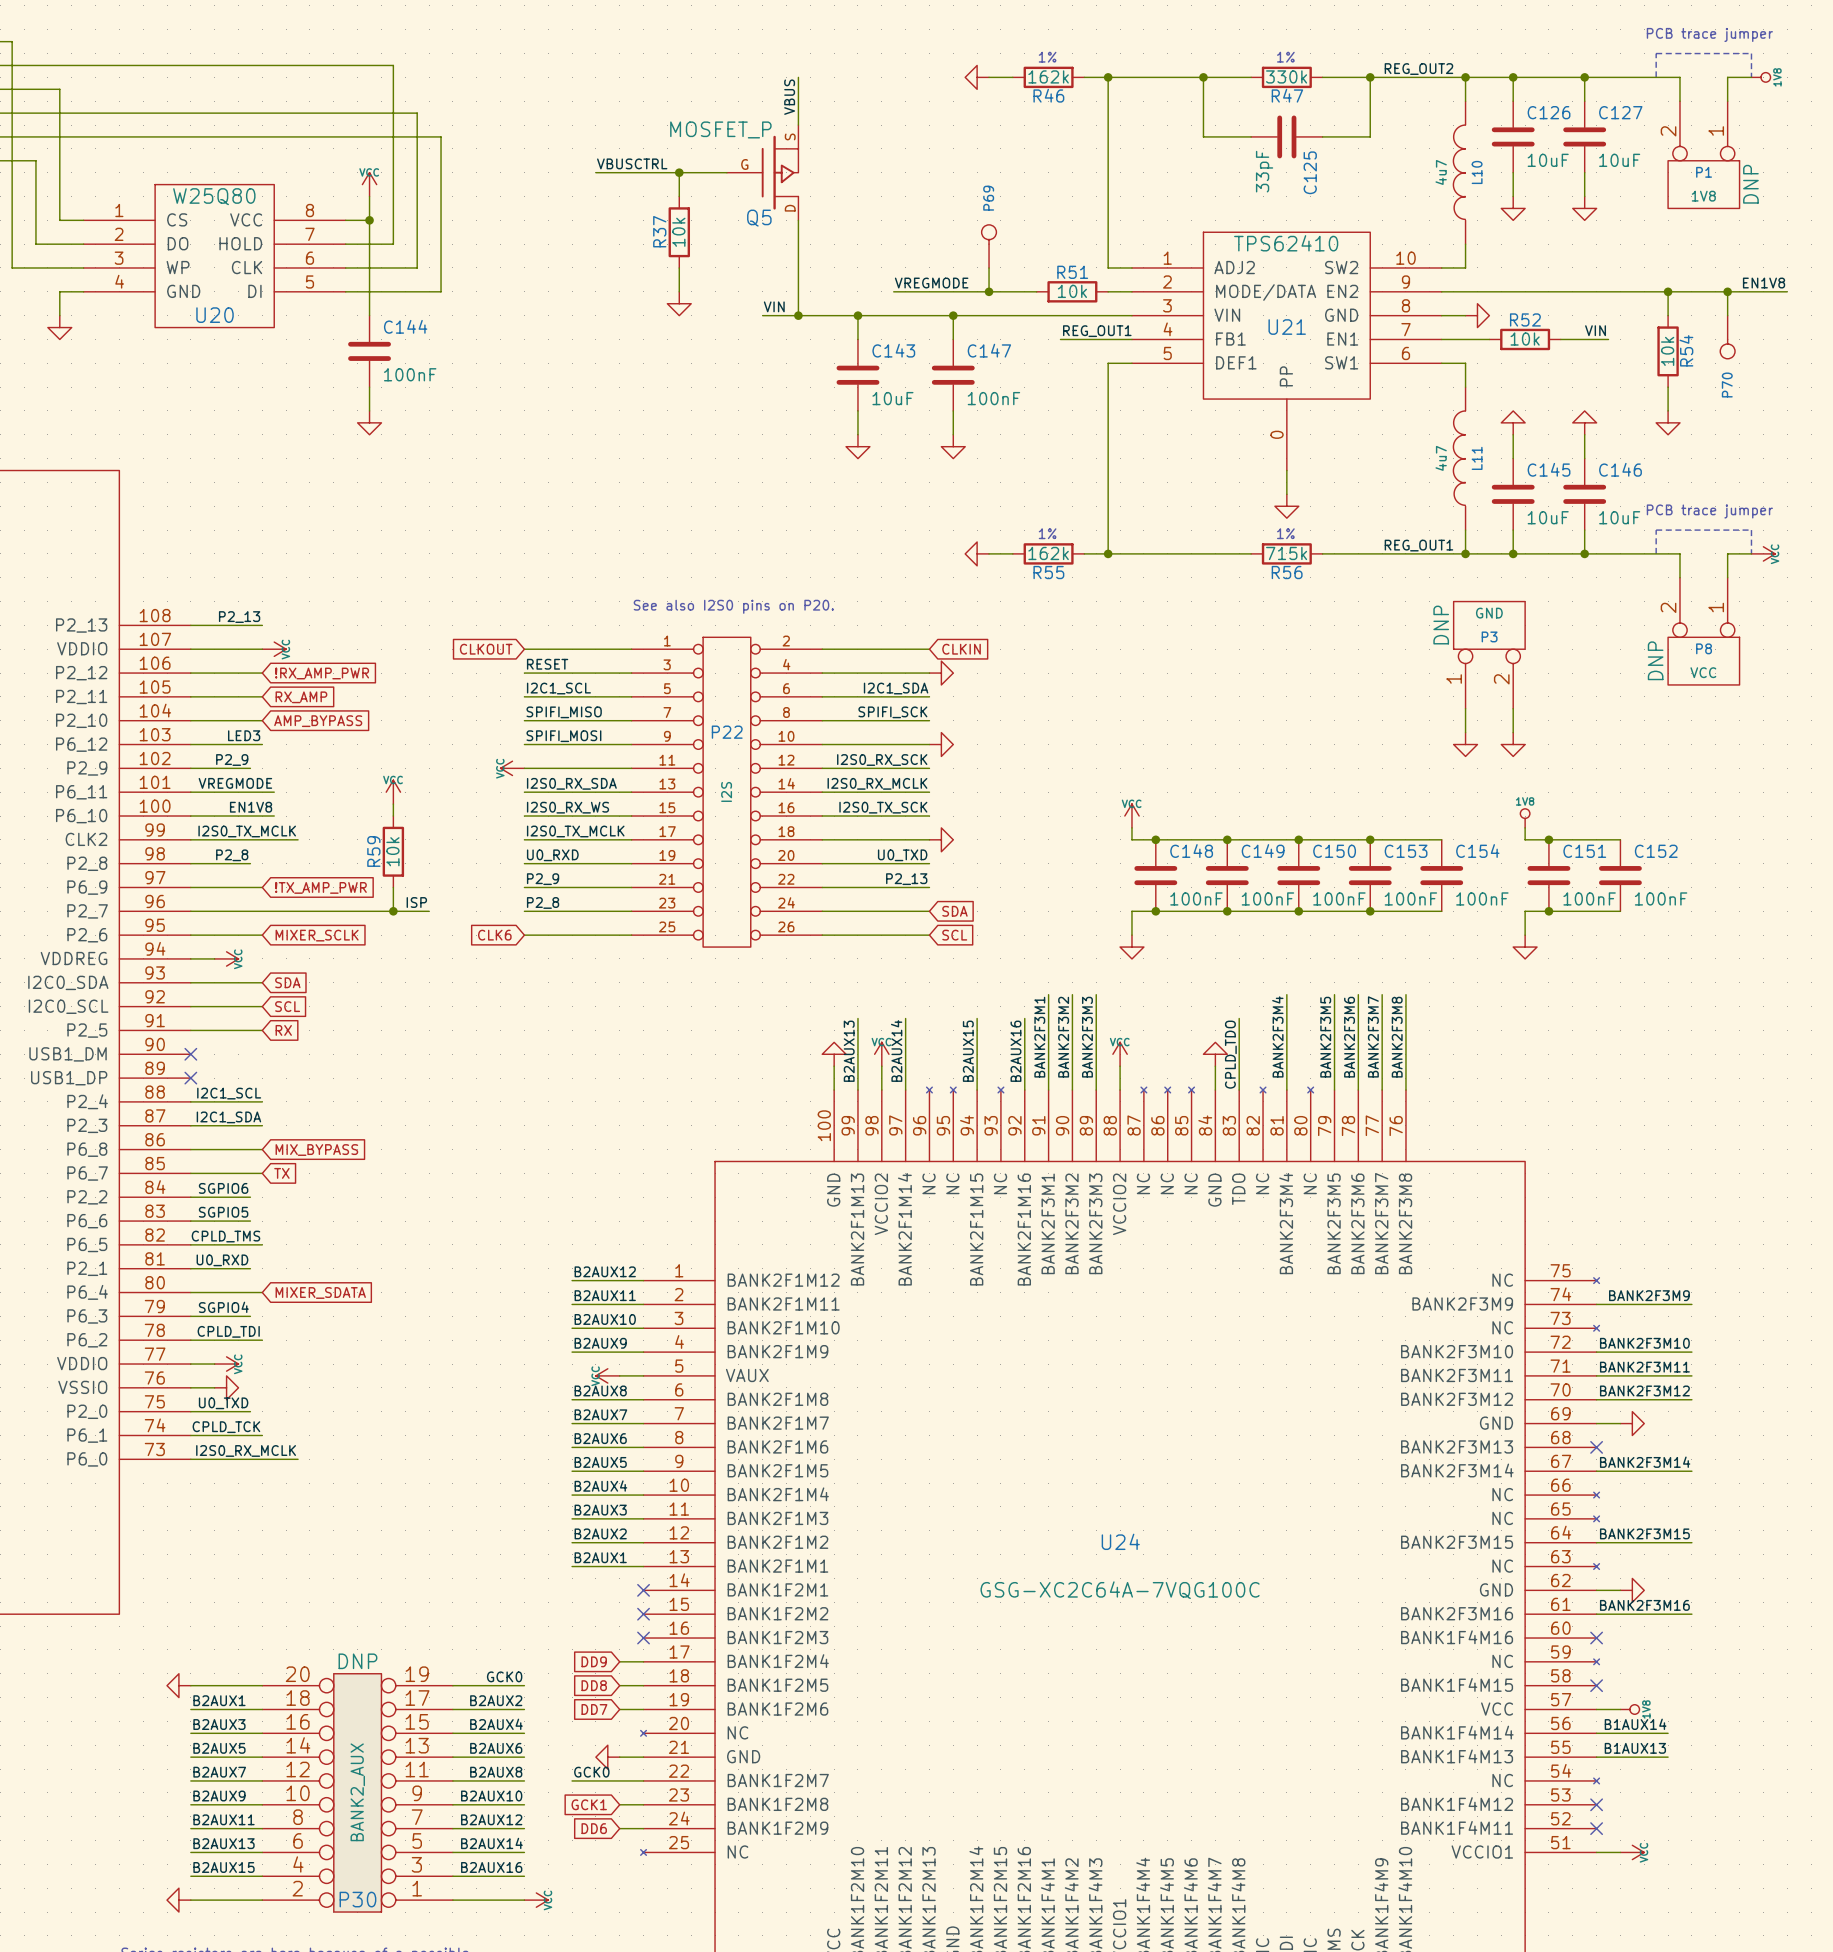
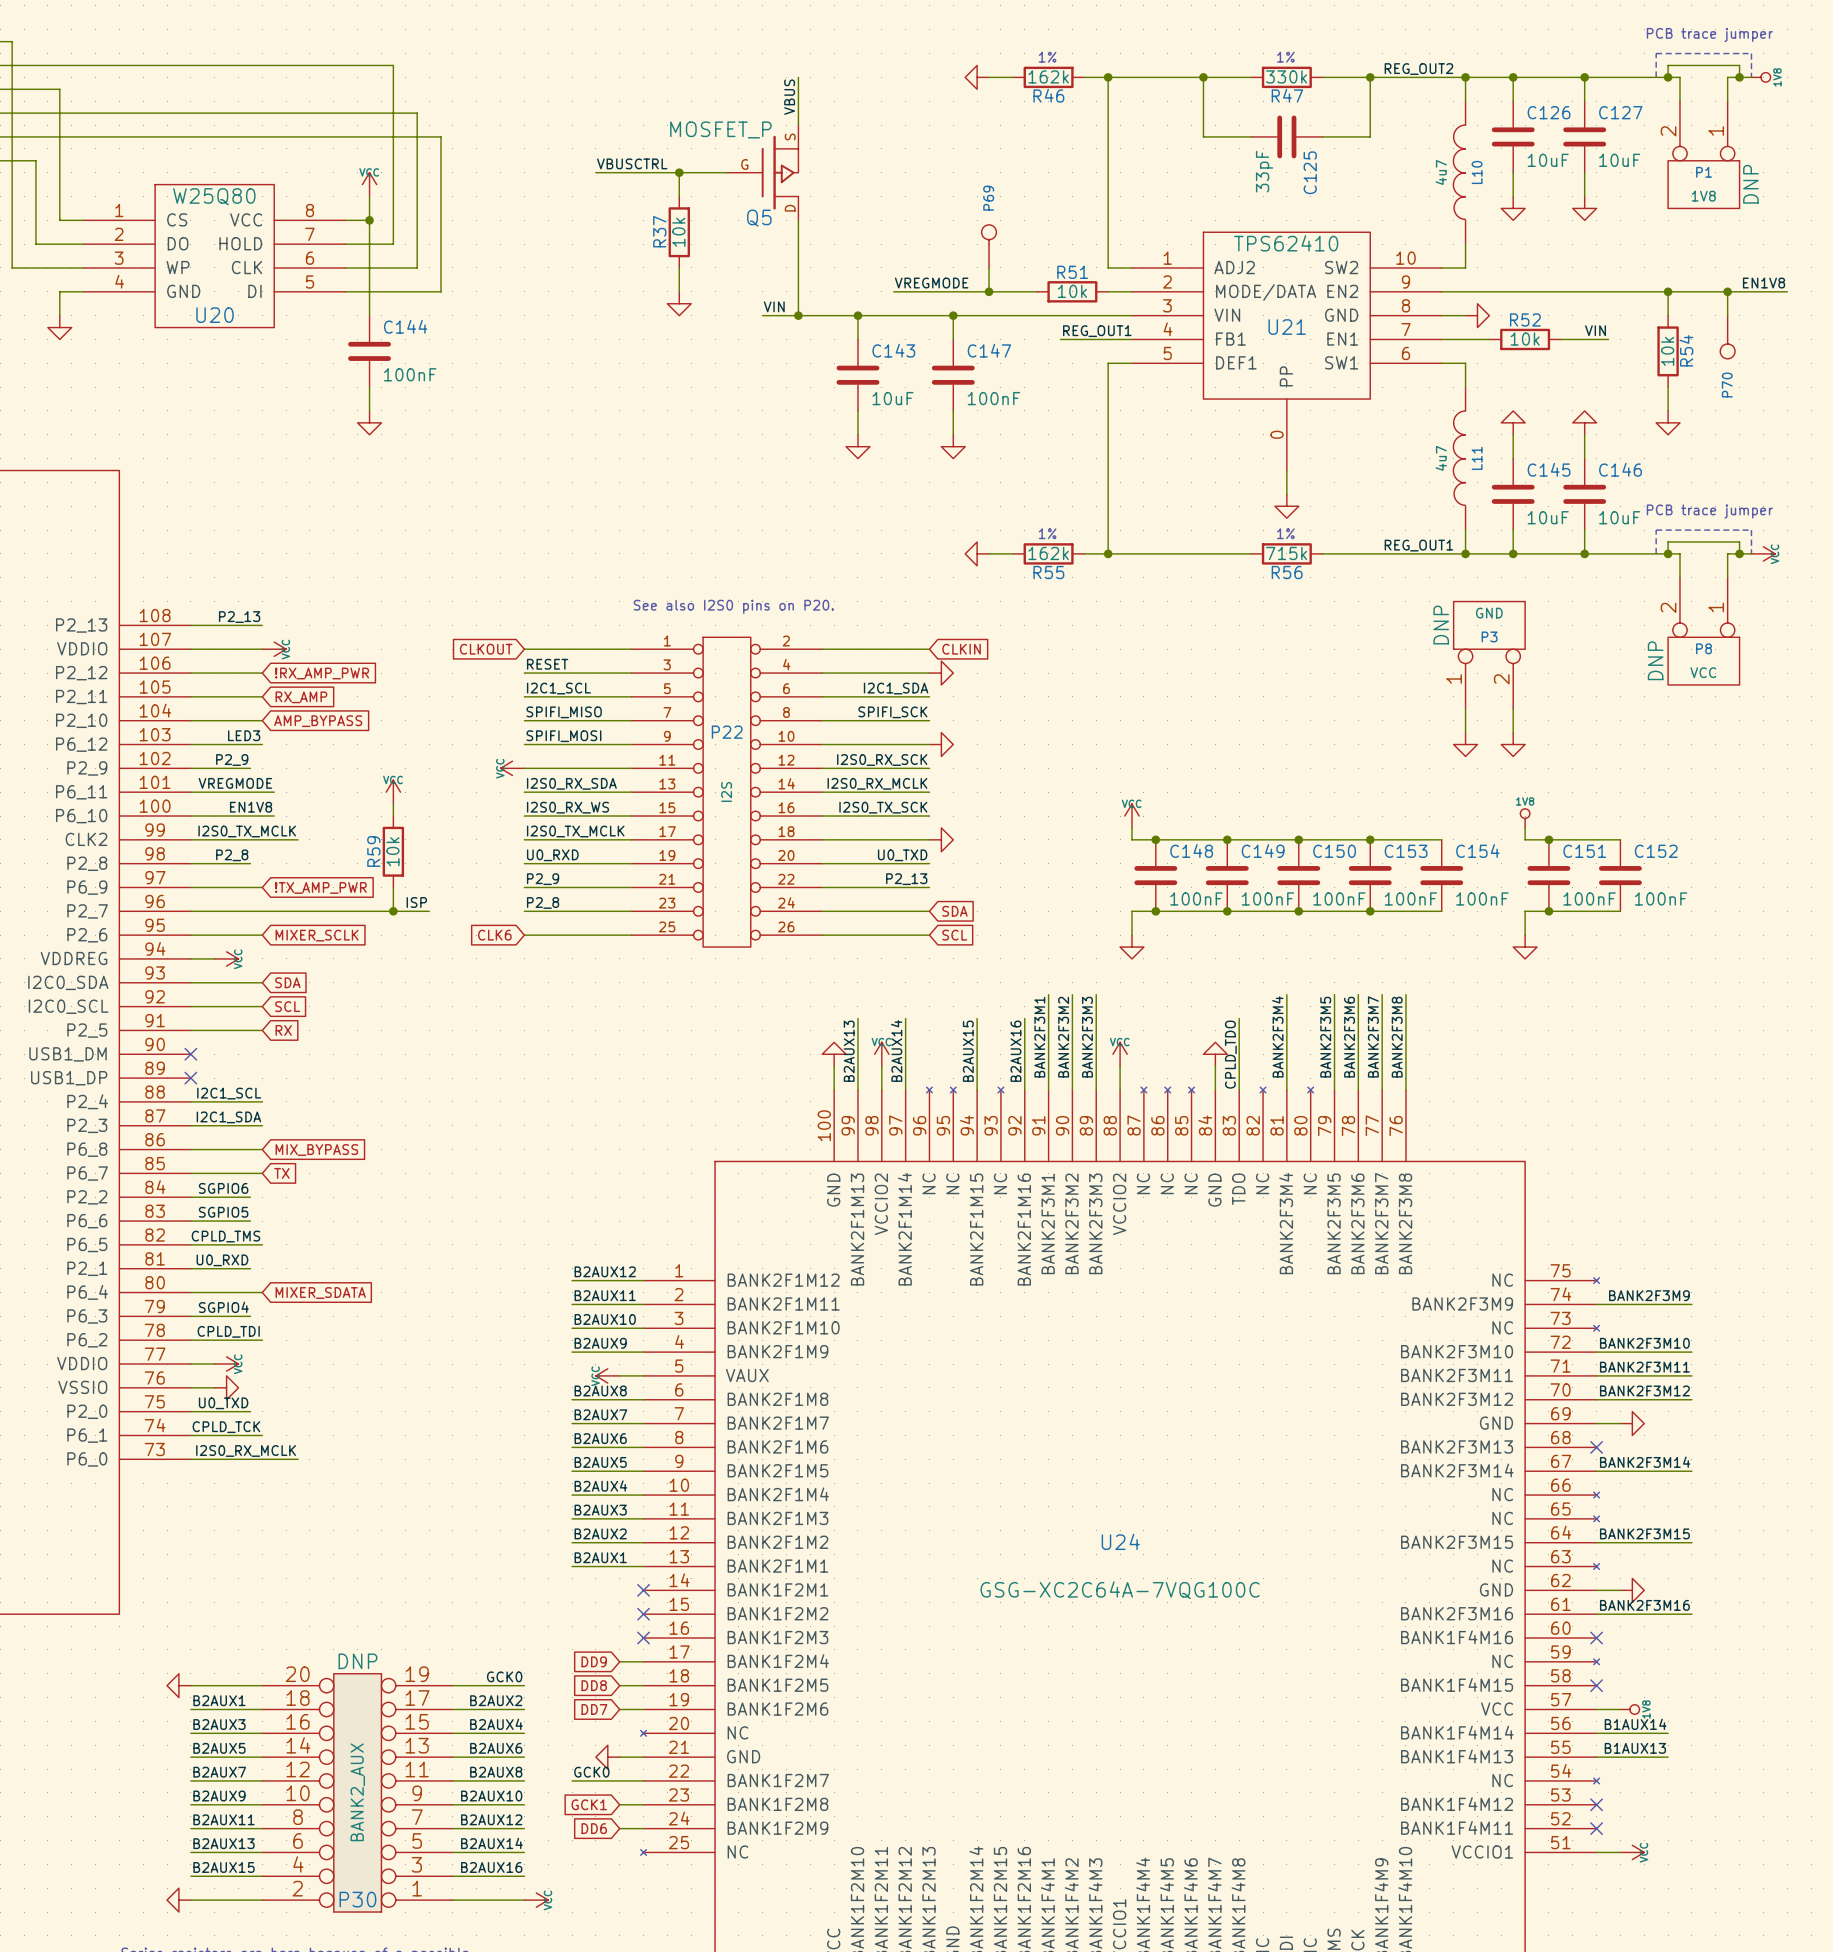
wire: none -> (1668, 77) (1668, 65) (1739, 65) (1739, 77)
junction: none -> (1668, 77)
junction: none -> (1739, 77)
wire: none -> (1668, 553) (1668, 542) (1739, 542) (1739, 553)
junction: none -> (1668, 553)
junction: none -> (1739, 553)

